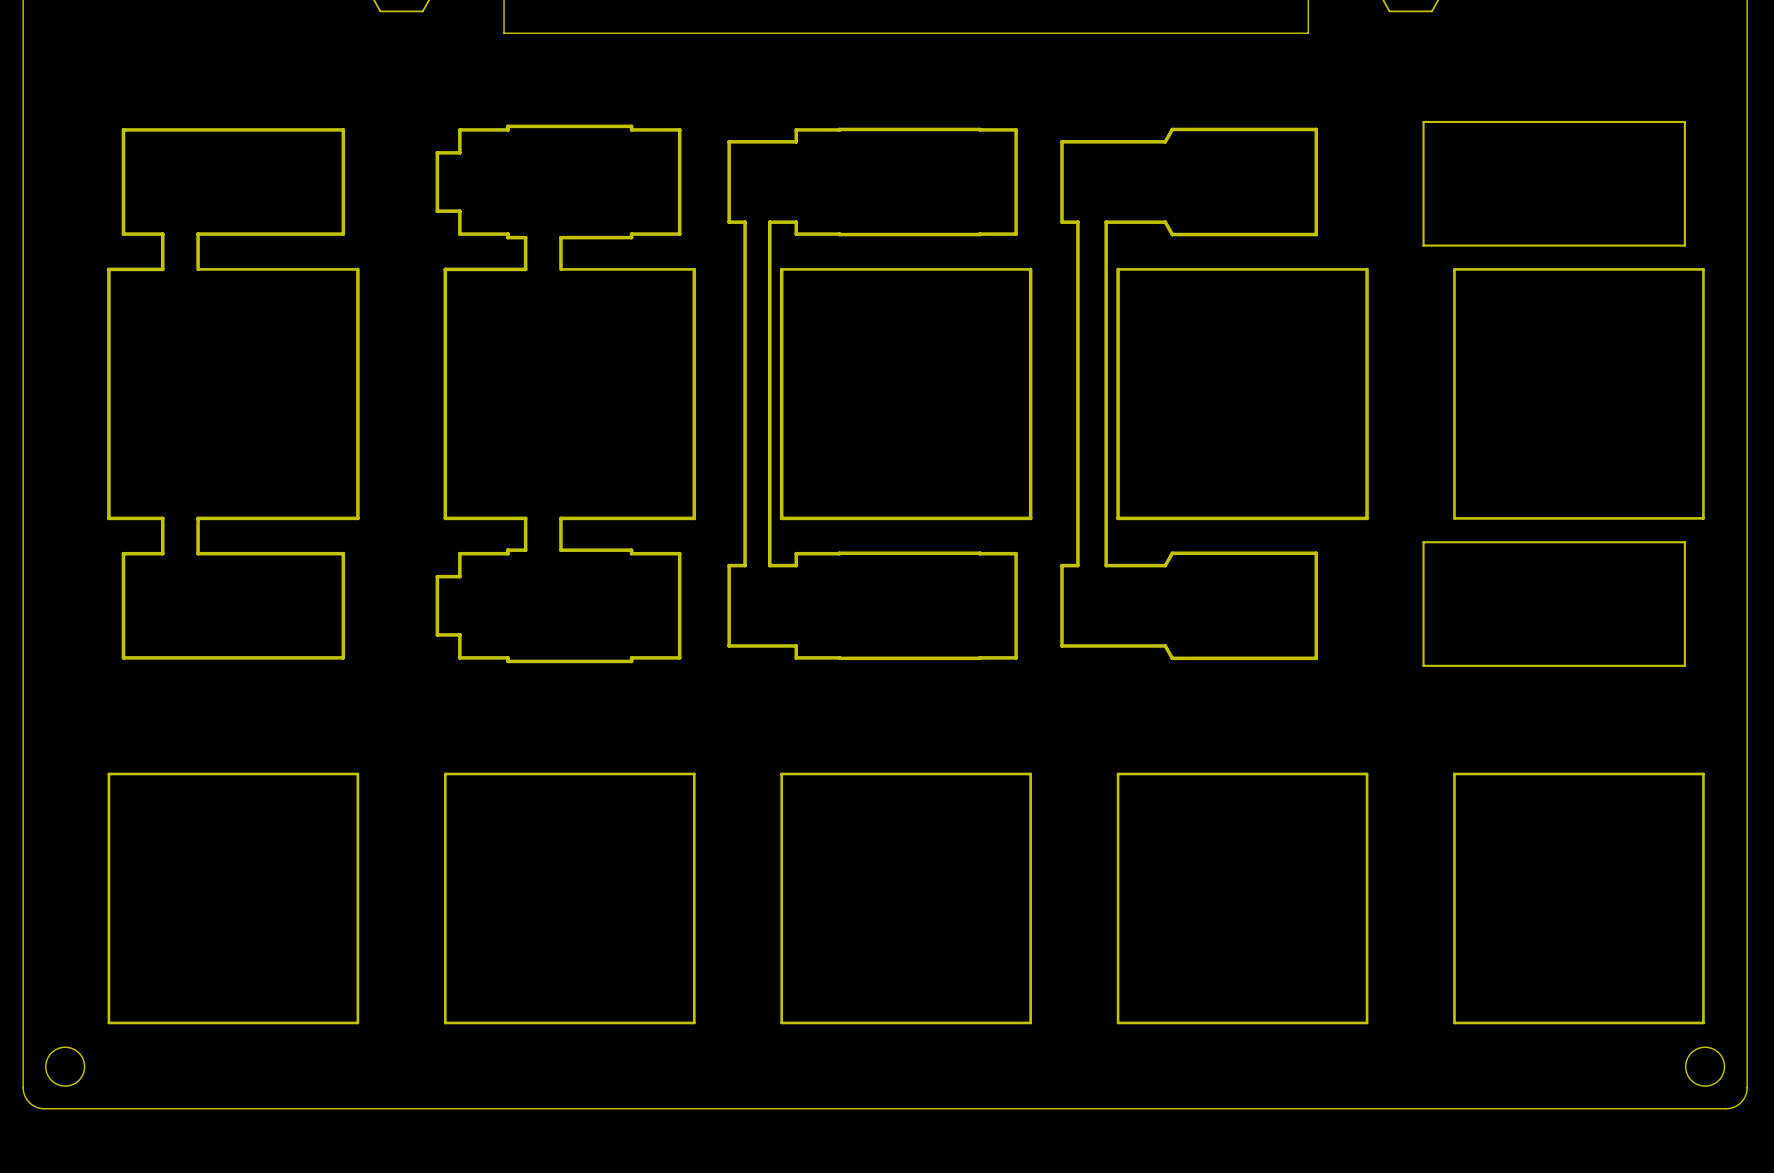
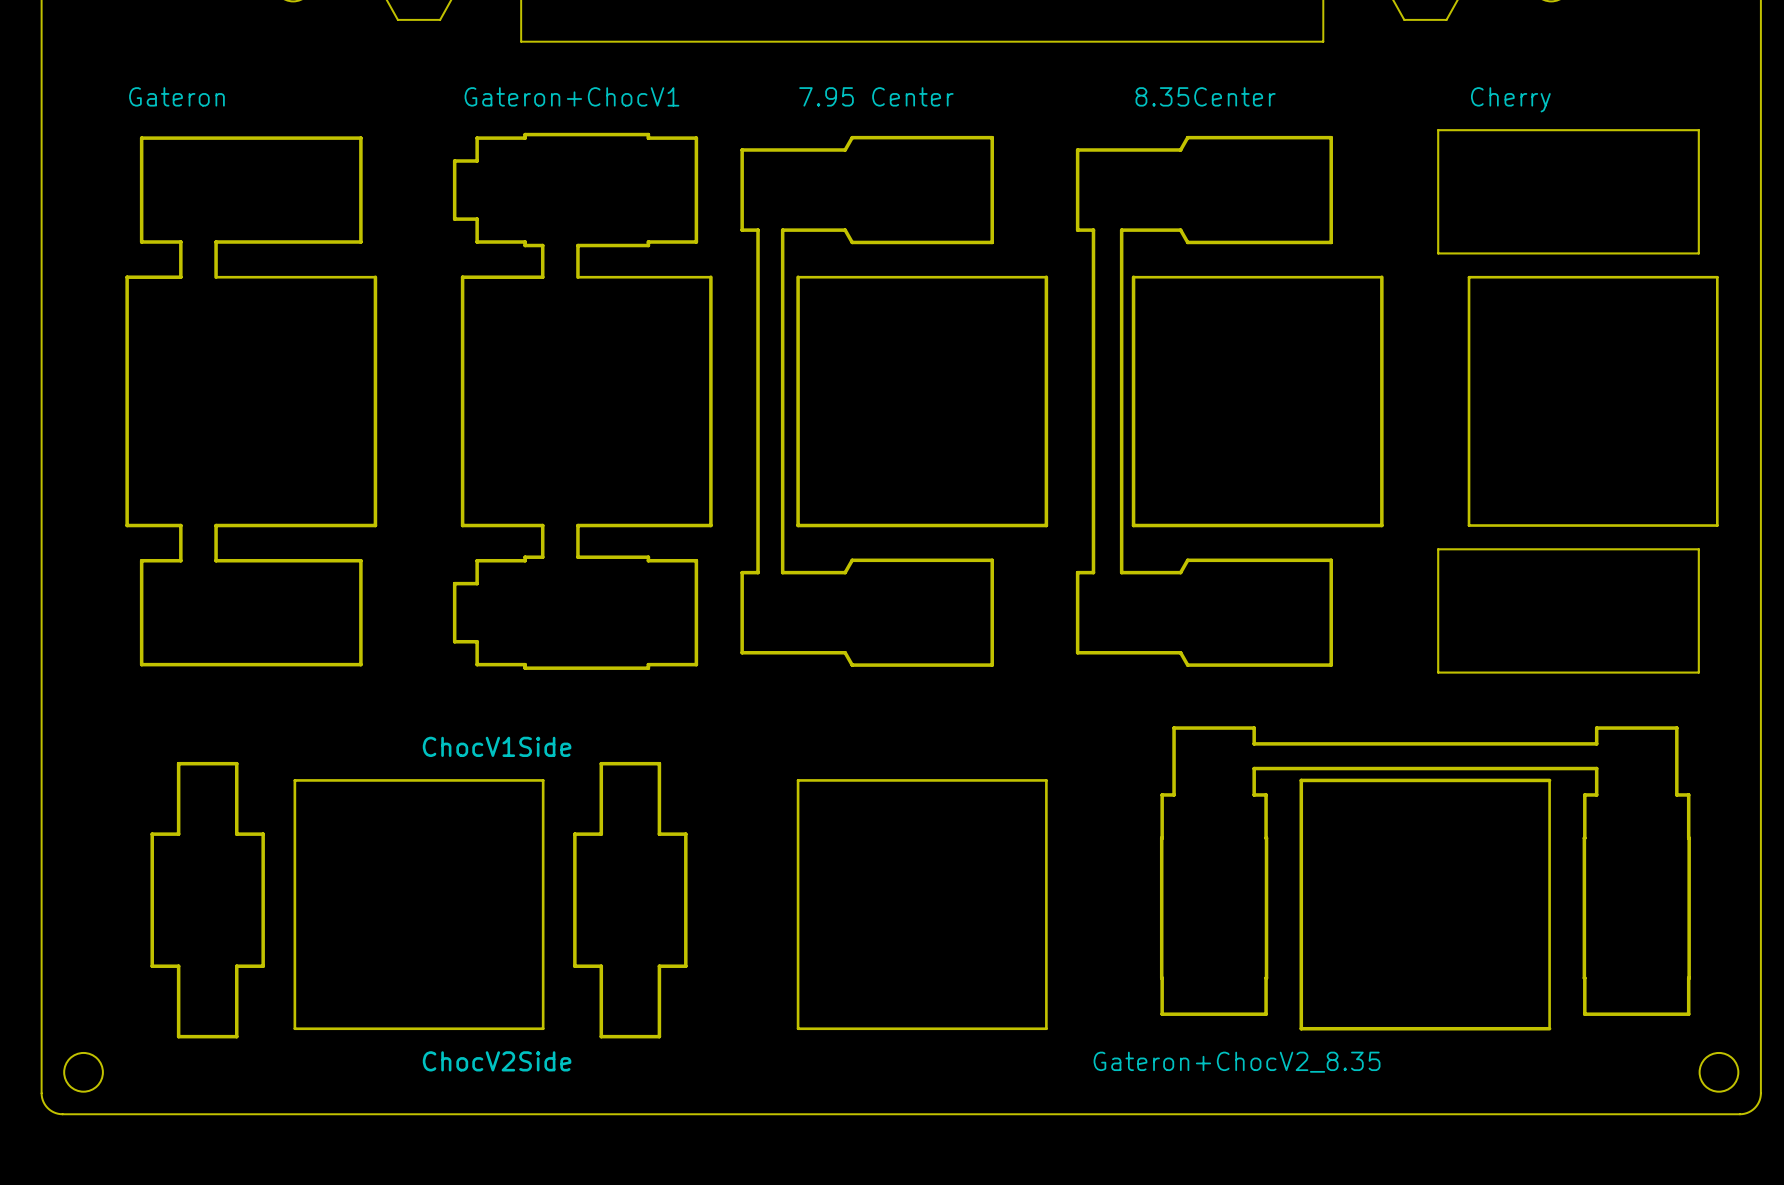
text: none -> Gateron (176, 96)
text: none -> Gateron+ChocV1 (571, 96)
text: none -> 7.95 Center (876, 96)
text: none -> 8.35Center (1205, 96)
text: none -> Cherry (1510, 99)
drawing shape: [727, 127, 1033, 661] -> [740, 135, 1049, 667]
drawing: none -> [1159, 726, 1691, 1031]
drawing: none -> [150, 761, 688, 1039]
drawing: [107, 772, 360, 1025] -> none
drawing: [443, 772, 696, 1025] -> none
drawing: [1116, 772, 1369, 1025] -> none
drawing: [1453, 772, 1705, 1025] -> none
text: none -> Gateron+ChocV2_8.35 (1237, 1062)

